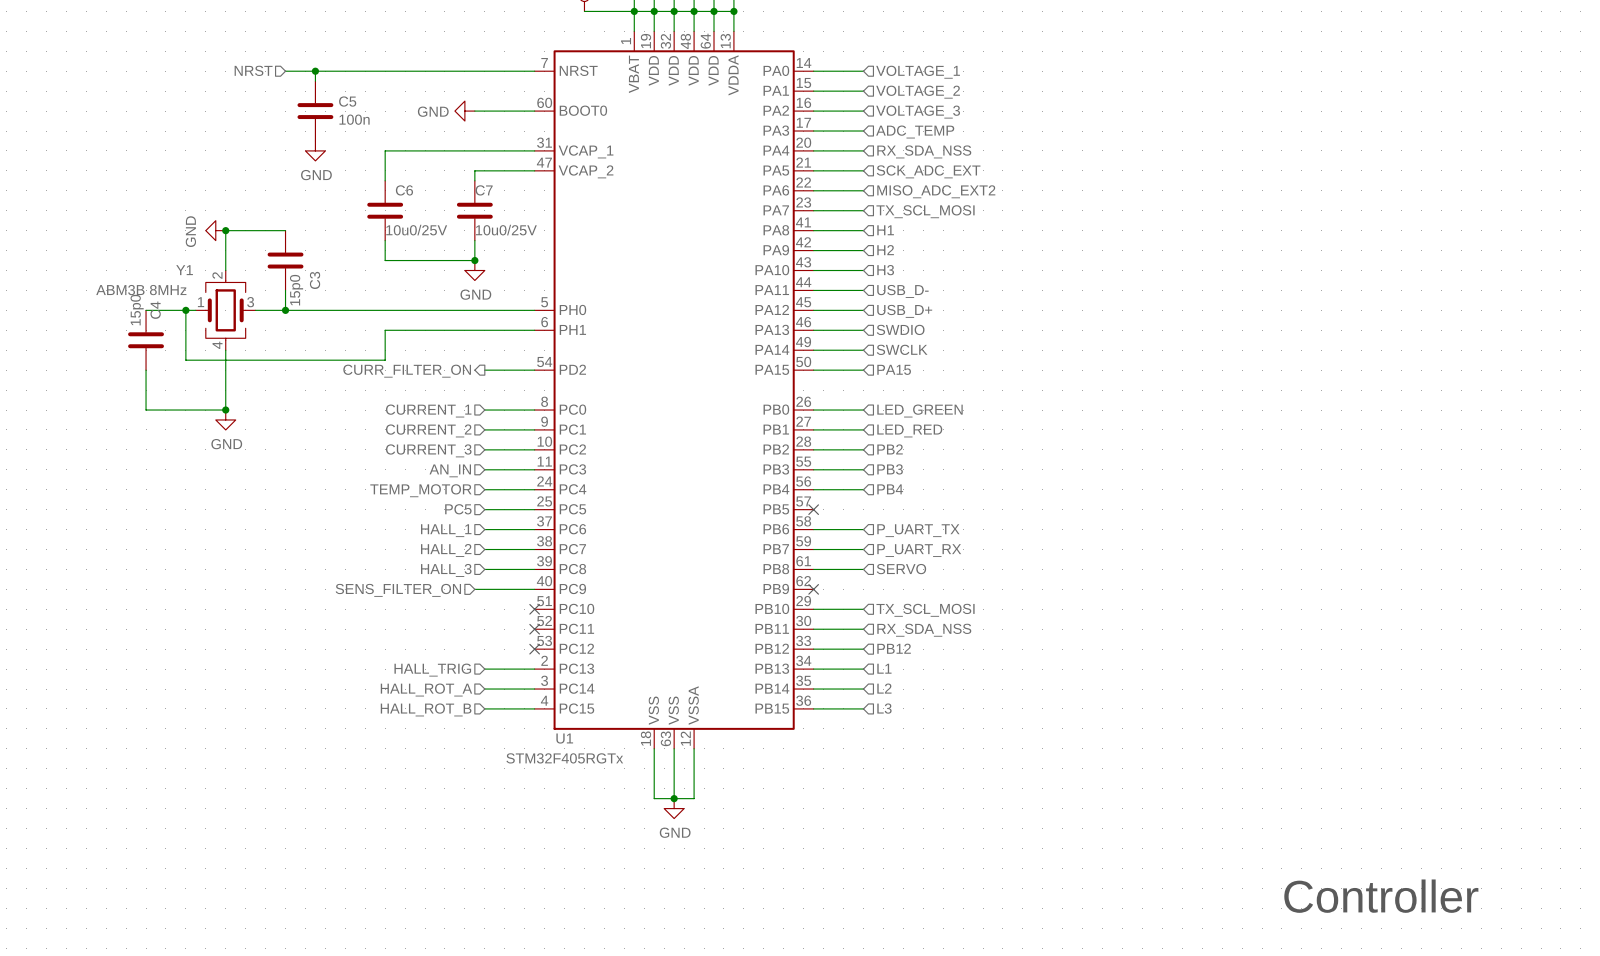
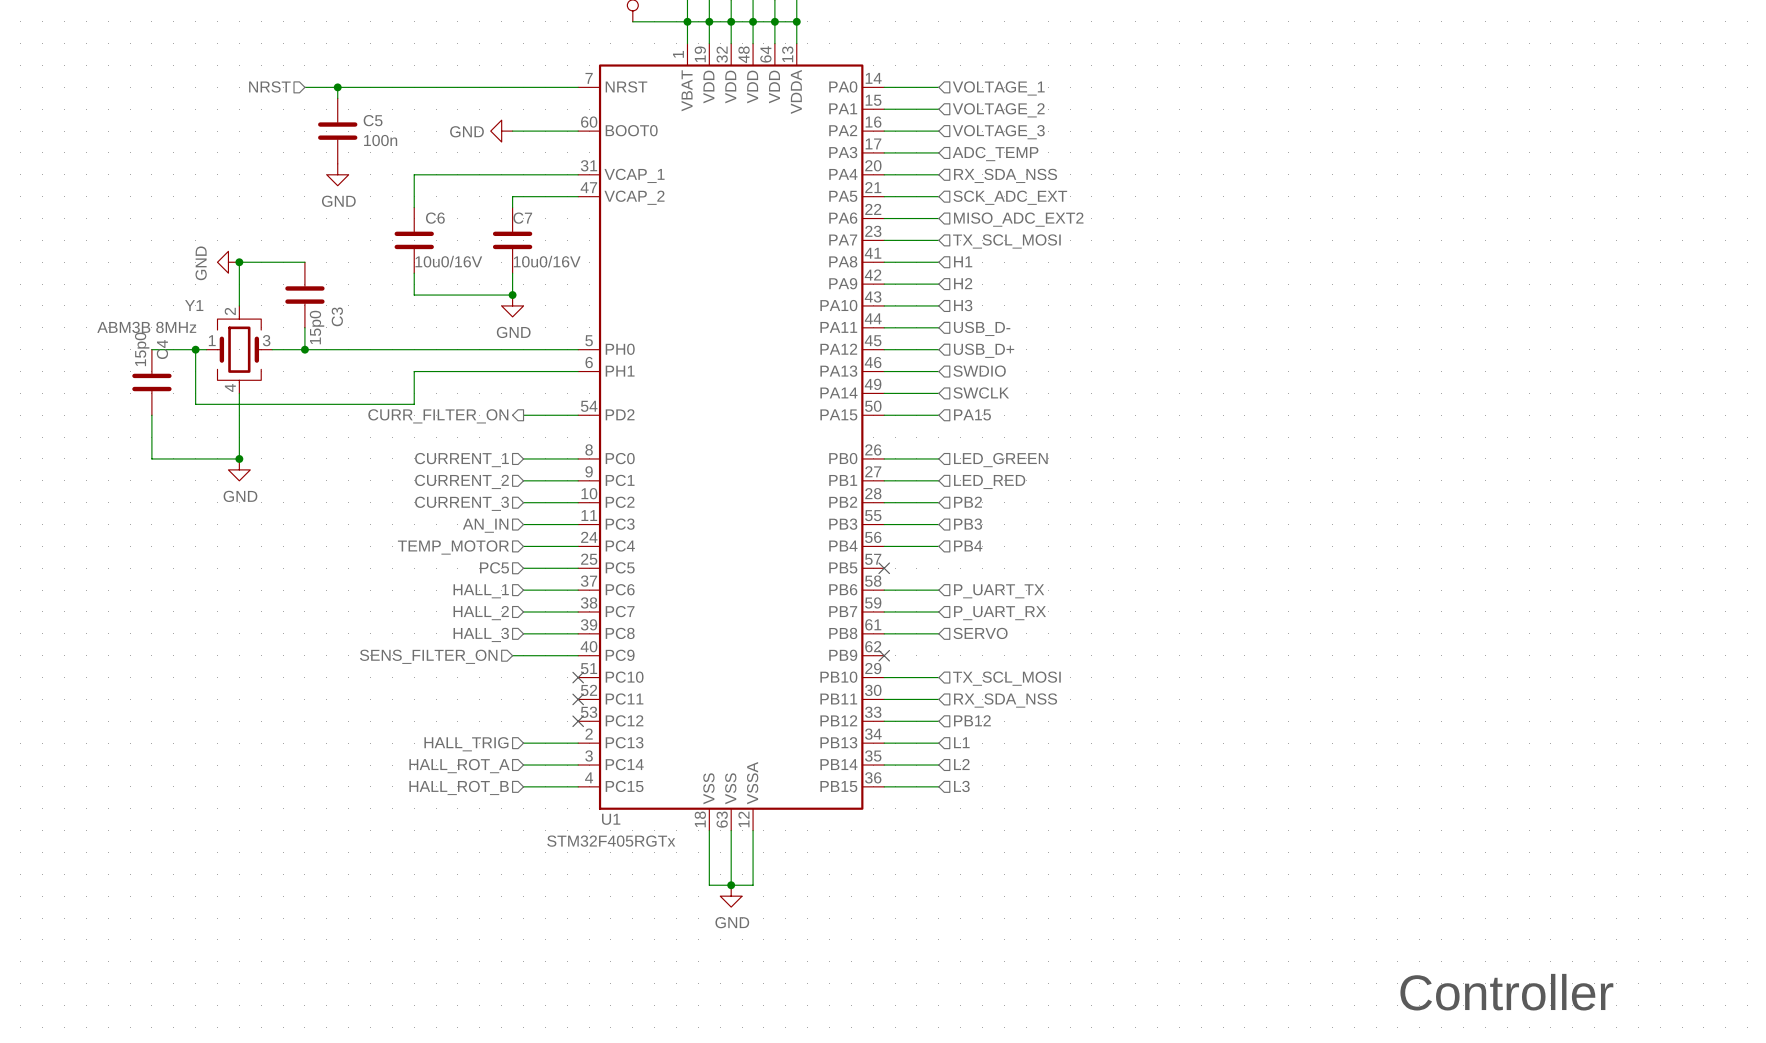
C6 value: 10u0/25V (416, 230) -> 10u0/16V (448, 261)
C7 value: 10u0/25V (506, 230) -> 10u0/16V (547, 261)

